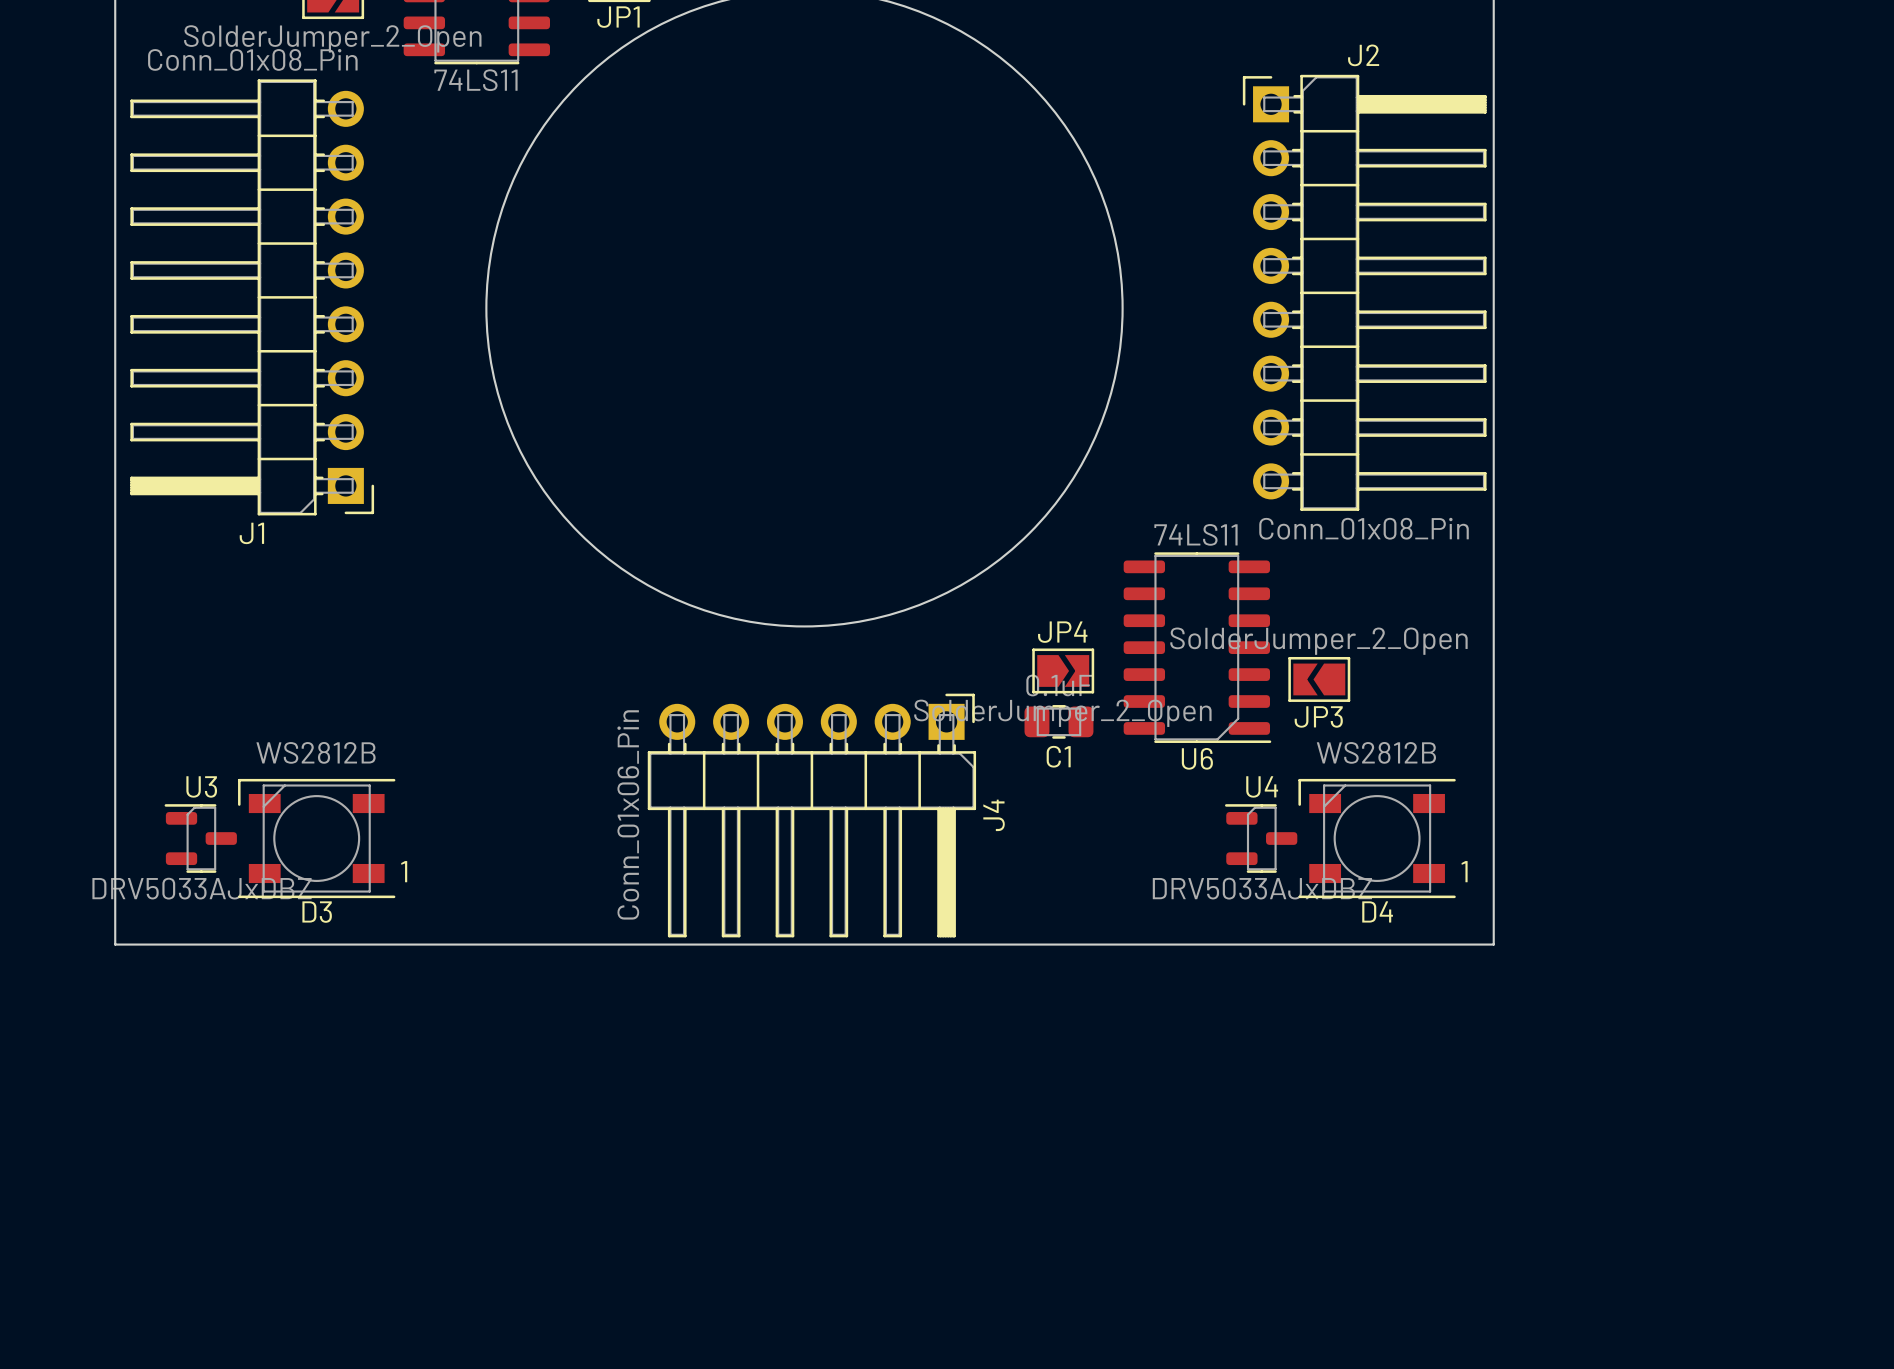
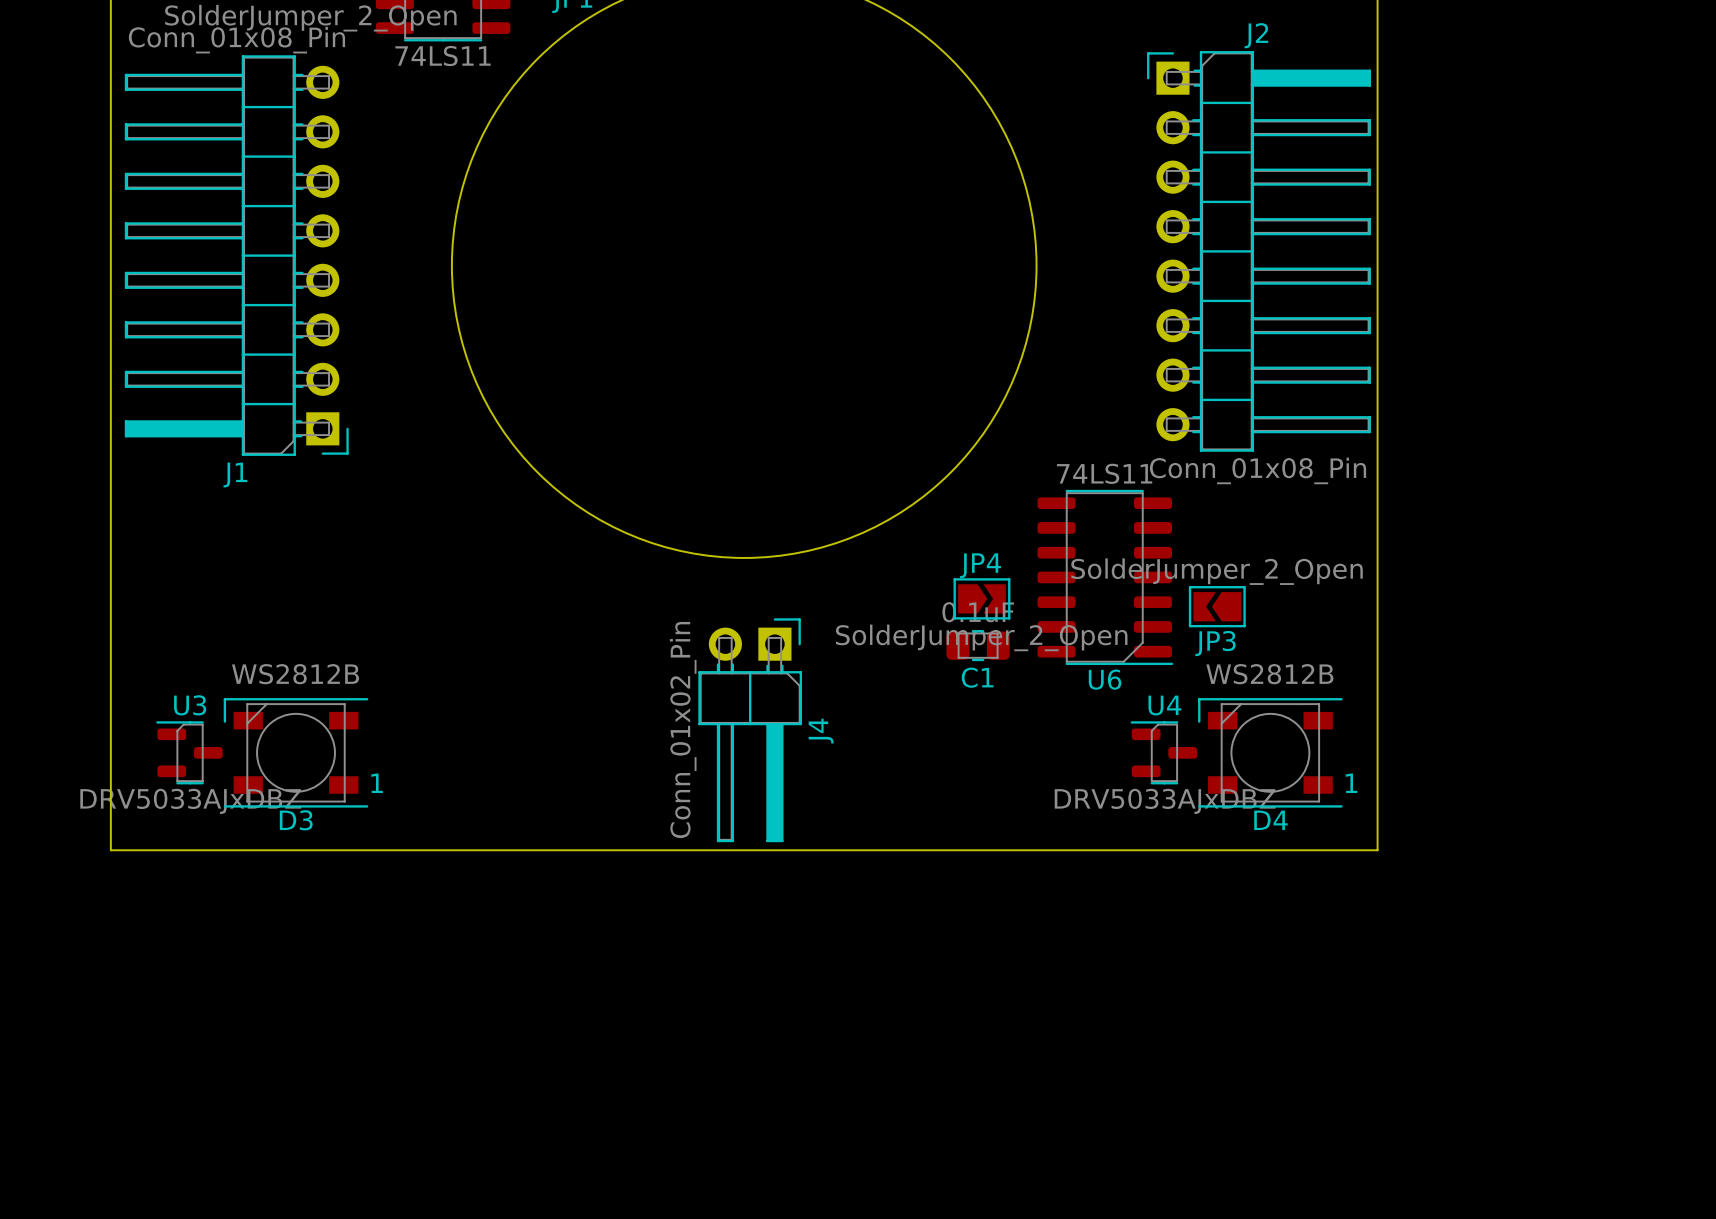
J4 footprint: [647, 693, 977, 938] -> [698, 618, 803, 843]
J4 value: Conn_01x06_Pin (628, 814) -> Conn_01x02_Pin (683, 730)
J4 name position: J4 (994, 815) -> J4 (821, 731)

